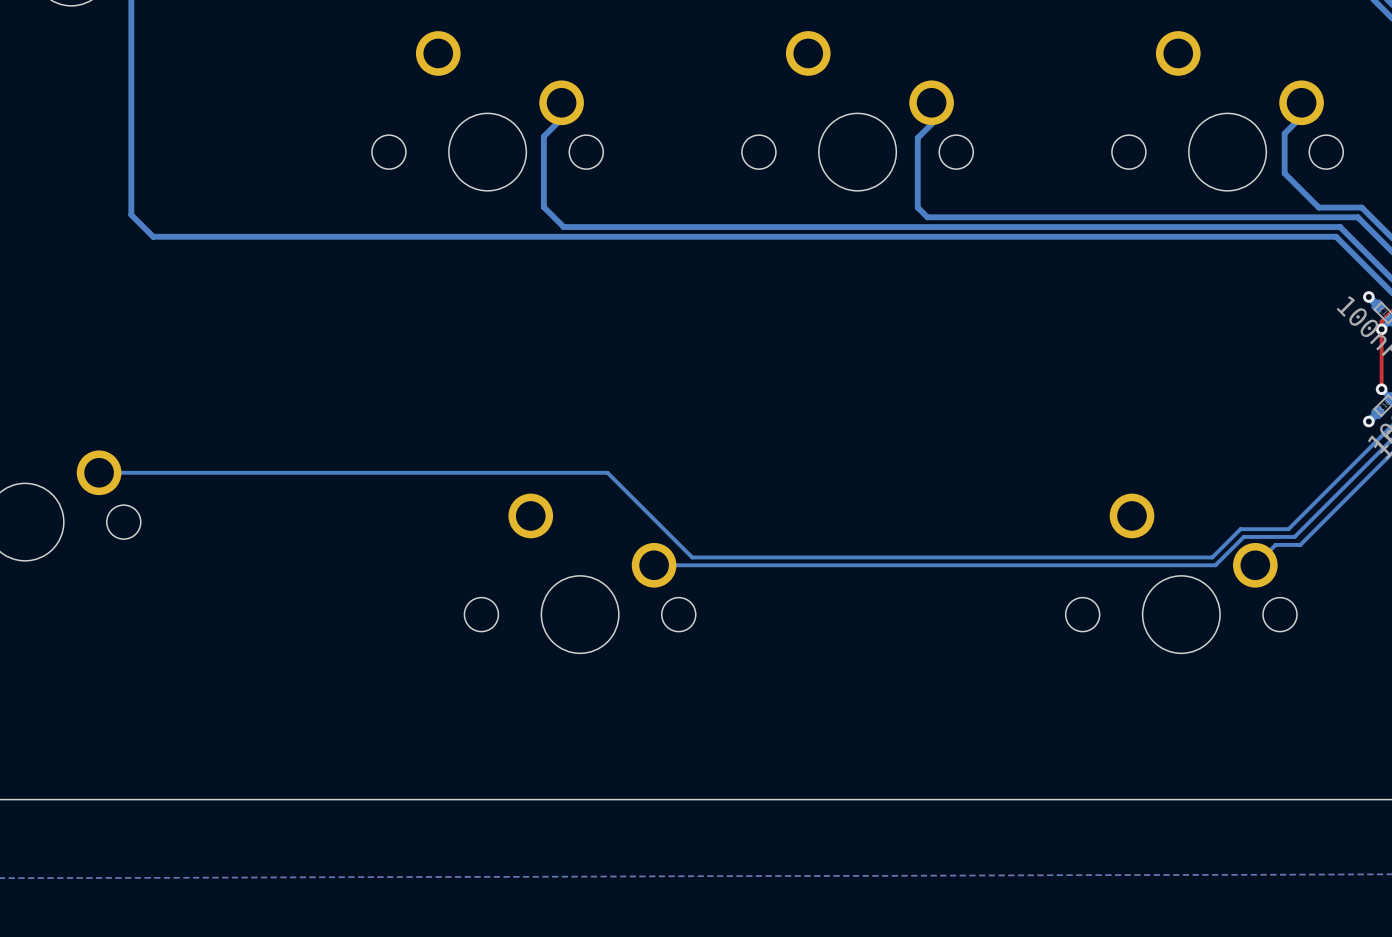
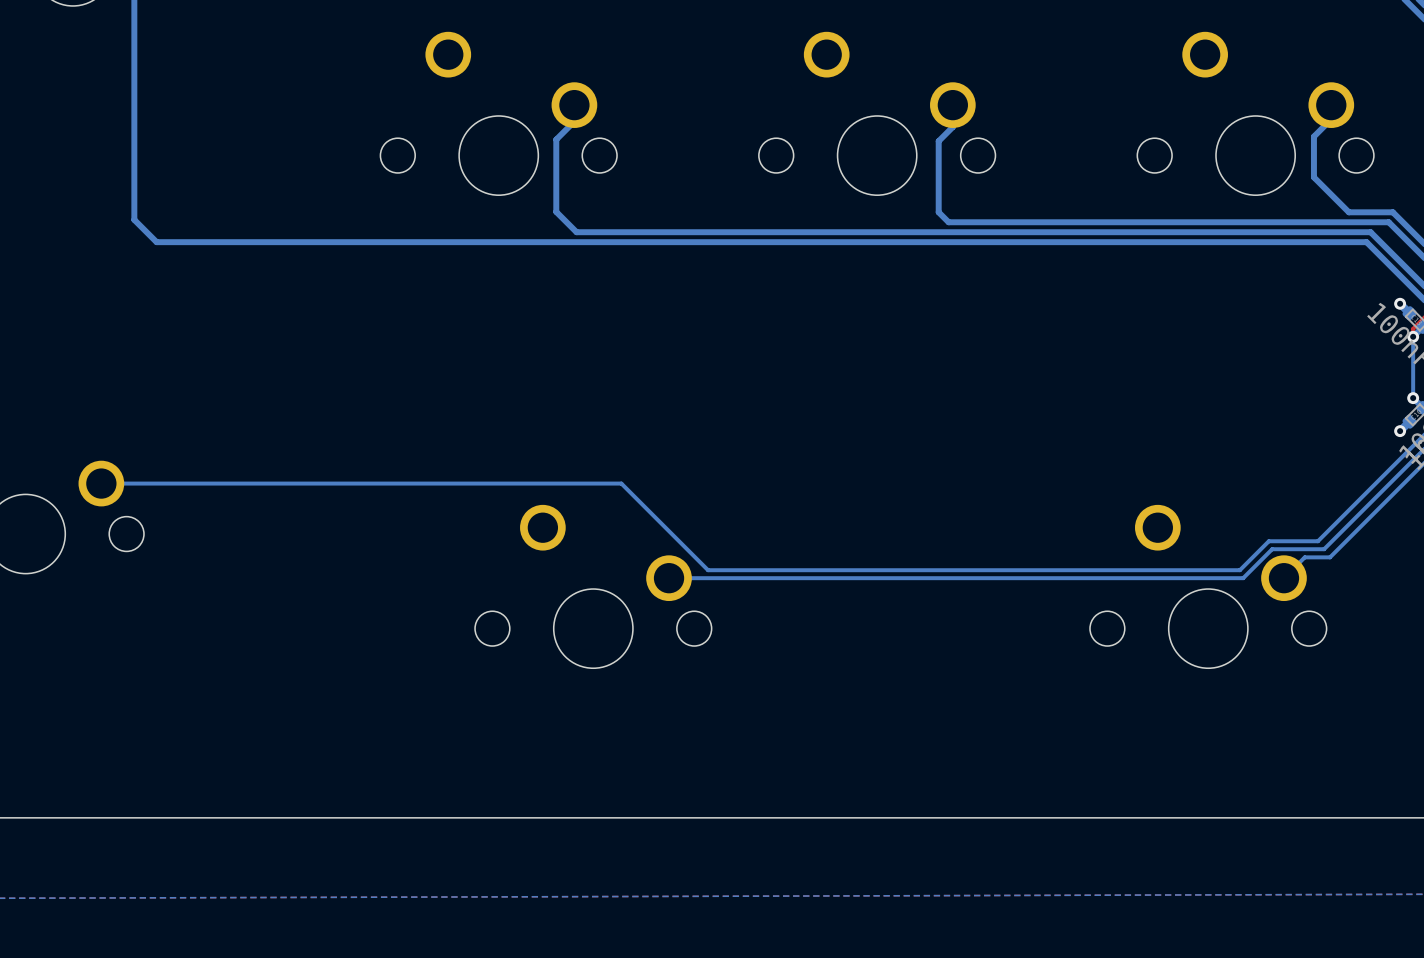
bottom track: none -> (1413, 336) (1413, 398)
top track: (1381, 329) (1381, 389) -> none

